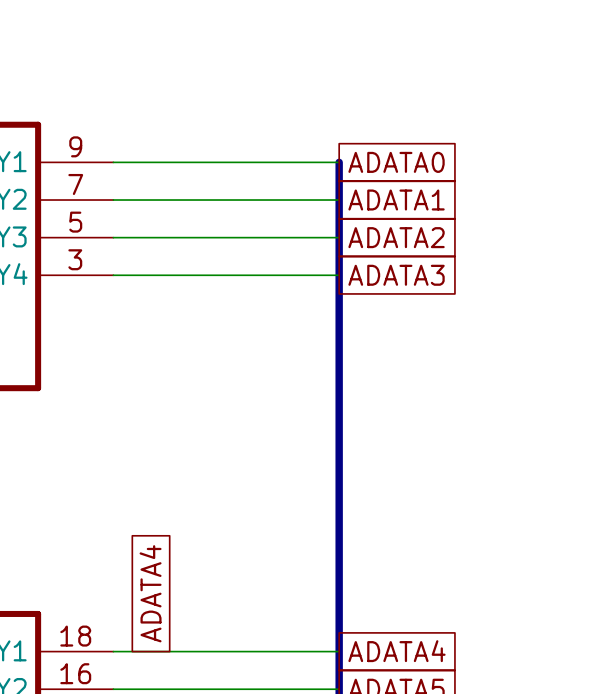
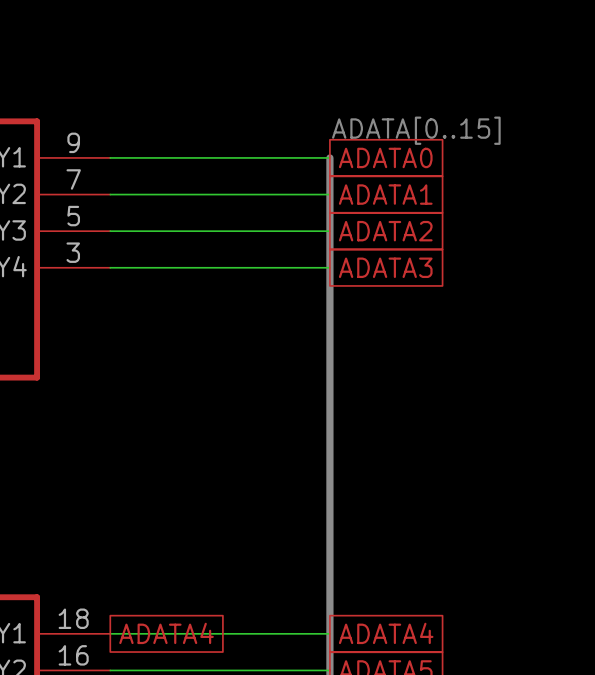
text: none -> ADATA[0..15] (416, 130)
global label rotation: 0° (150, 593) -> 90° clockwise (166, 633)

